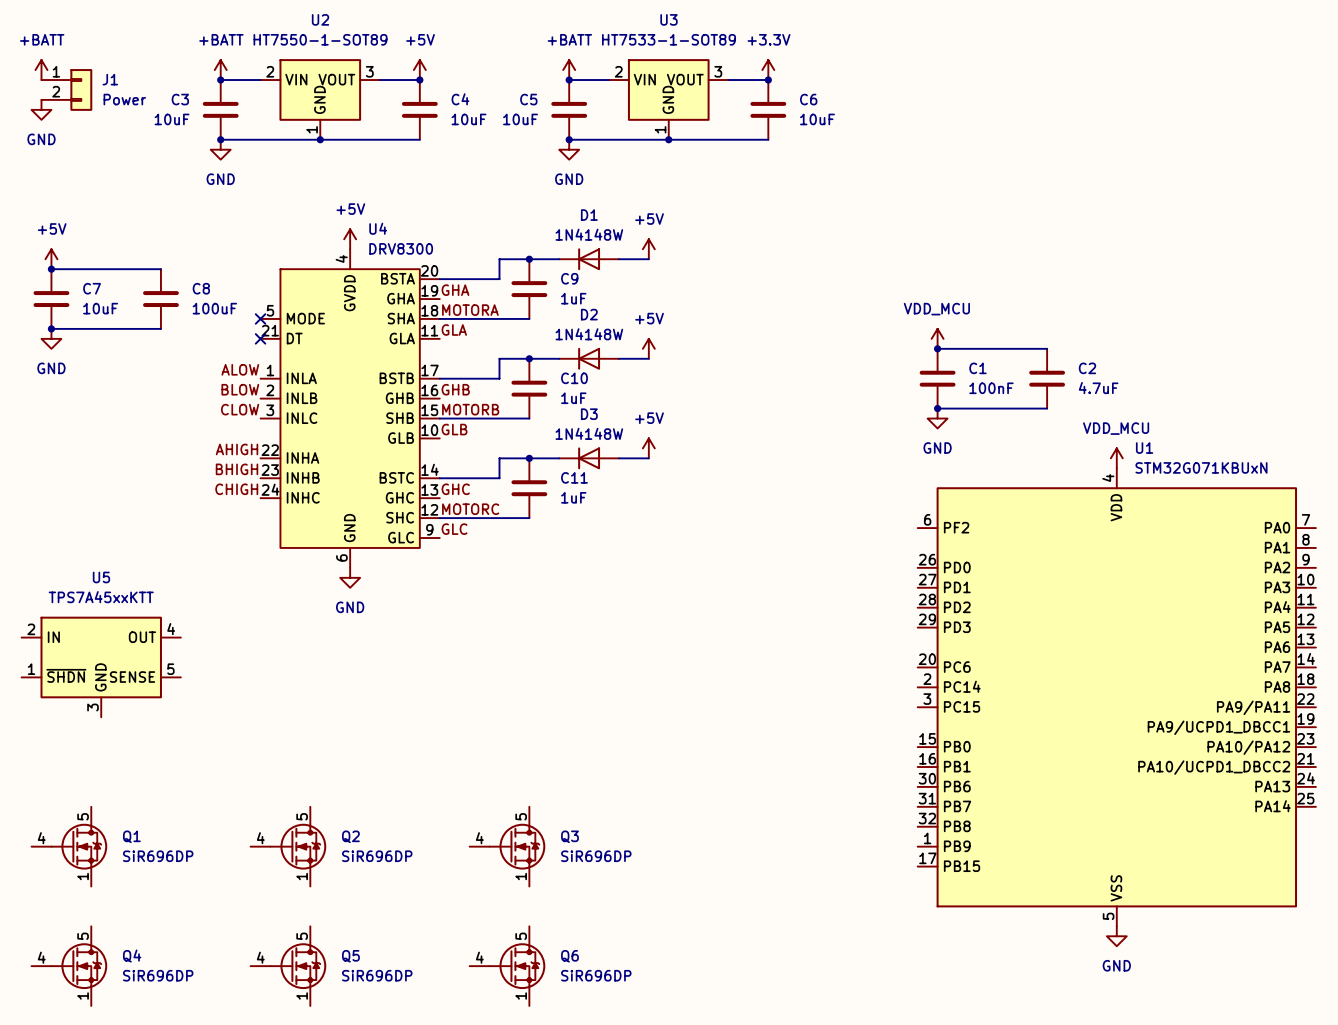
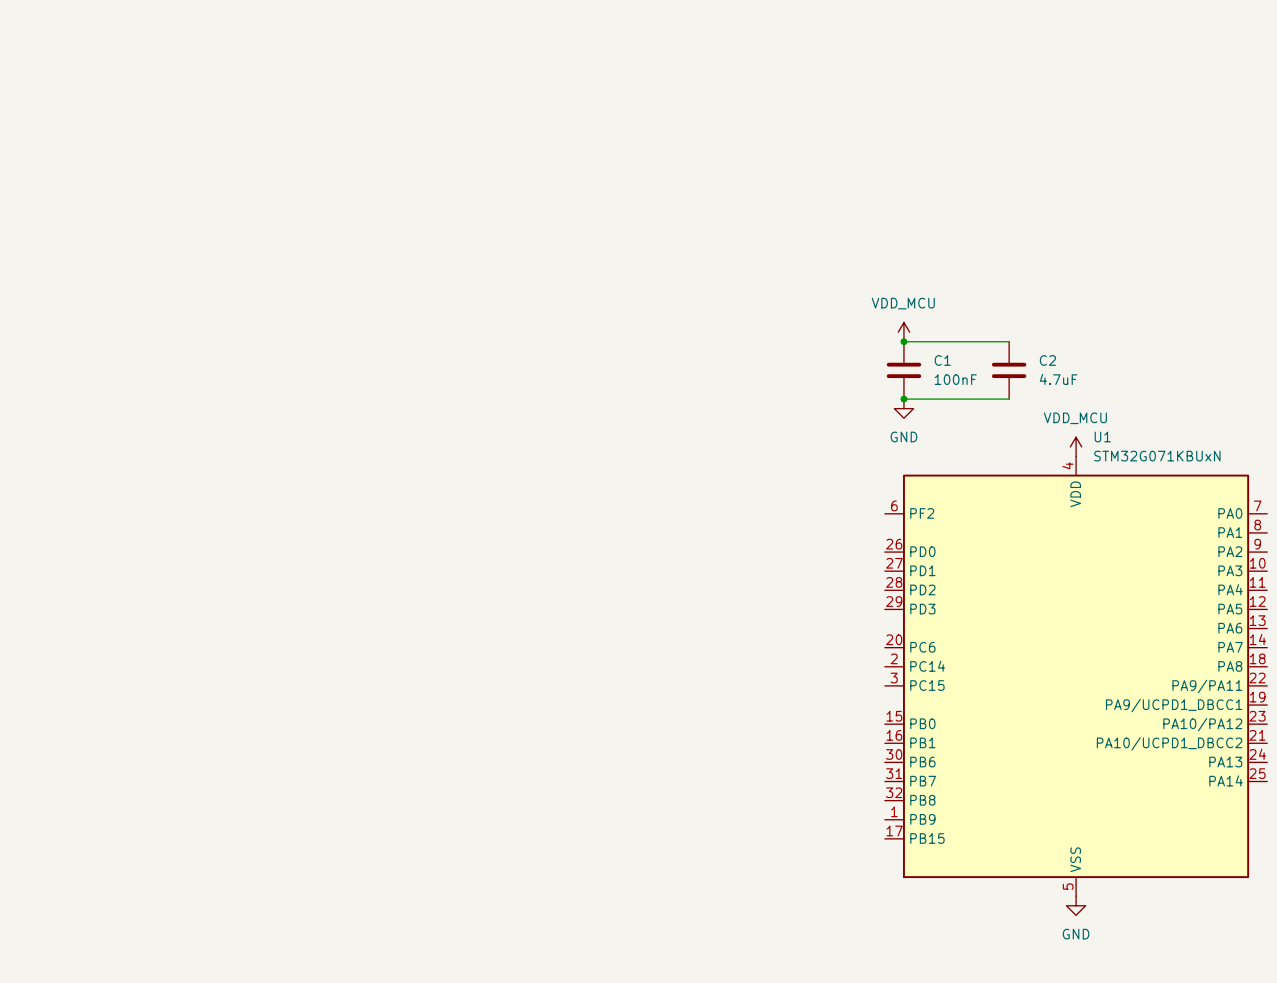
power symbol: +BATT (41, 70) -> none
power symbol: +BATT (220, 70) -> none
power symbol: +5V (419, 70) -> none
power symbol: +BATT (569, 70) -> none
power symbol: +3.3V (768, 70) -> none
wire: (220, 80) (260, 80) -> none
junction: (220, 80) -> none
wire: (380, 80) (419, 80) -> none
junction: (419, 80) -> none
wire: (569, 80) (609, 80) -> none
junction: (569, 80) -> none
wire: (728, 80) (768, 80) -> none
junction: (768, 80) -> none
J1: Power (66, 89) -> none
U2: HT7550-1-SOT89 (320, 99) -> none
U3: HT7533-1-SOT89 (668, 99) -> none
power symbol: GND (41, 109) -> none
C3: 10uF (220, 109) -> none
C4: 10uF (419, 109) -> none
C5: 10uF (569, 109) -> none
C6: 10uF (768, 109) -> none
wire: (220, 139) (419, 139) -> none
junction: (220, 139) -> none
junction: (320, 139) -> none
wire: (569, 139) (768, 139) -> none
junction: (569, 139) -> none
junction: (668, 139) -> none
power symbol: GND (220, 149) -> none
power symbol: GND (569, 149) -> none
power symbol: +5V (350, 239) -> none
power symbol: +5V (648, 249) -> none
power symbol: +5V (51, 259) -> none
junction: (529, 259) -> none
wire: (559, 259) (499, 259) (499, 279) (439, 279) -> none
D1: 1N4148W (589, 259) -> none
wire: (618, 259) (648, 259) -> none
wire: (51, 269) (160, 269) -> none
junction: (51, 269) -> none
C9: 1uF (529, 289) -> none
label: GHA (455, 290) -> none
C7: 10uF (51, 299) -> none
C8: 100uF (160, 299) -> none
label: MOTORA (470, 310) -> none
no-connect mark: (260, 318) -> none
wire: (439, 318) (529, 318) -> none
wire: (51, 328) (160, 328) -> none
junction: (51, 328) -> none
label: GLA (454, 329) -> none
power symbol: GND (51, 338) -> none
no-connect mark: (260, 338) -> none
power symbol: +5V (648, 348) -> none
junction: (529, 358) -> none
wire: (559, 358) (499, 358) (499, 378) (439, 378) -> none
D2: 1N4148W (589, 358) -> none
wire: (618, 358) (648, 358) -> none
label: ALOW (240, 369) -> none
C10: 1uF (529, 388) -> none
label: BLOW (240, 389) -> none
label: GHB (455, 389) -> none
U4: DRV8300 (350, 408) -> none
label: CLOW (240, 409) -> none
label: MOTORB (470, 409) -> none
wire: (439, 418) (529, 418) -> none
label: GLB (454, 429) -> none
power symbol: +5V (648, 448) -> none
label: AHIGH (236, 449) -> none
junction: (529, 458) -> none
wire: (559, 458) (499, 458) (499, 478) (439, 478) -> none
D3: 1N4148W (589, 458) -> none
wire: (618, 458) (648, 458) -> none
label: BHIGH (236, 469) -> none
C11: 1uF (529, 488) -> none
label: CHIGH (236, 489) -> none
label: GHC (455, 489) -> none
label: MOTORC (470, 509) -> none
wire: (439, 518) (529, 518) -> none
label: GLC (454, 529) -> none
power symbol: GND (350, 577) -> none
U5: TPS7A45xxKTT (101, 666) -> none
Q1: SiR696DP (69, 846) -> none
Q2: SiR696DP (288, 846) -> none
Q3: SiR696DP (507, 846) -> none
Q4: SiR696DP (69, 966) -> none
Q5: SiR696DP (288, 966) -> none
Q6: SiR696DP (507, 966) -> none

